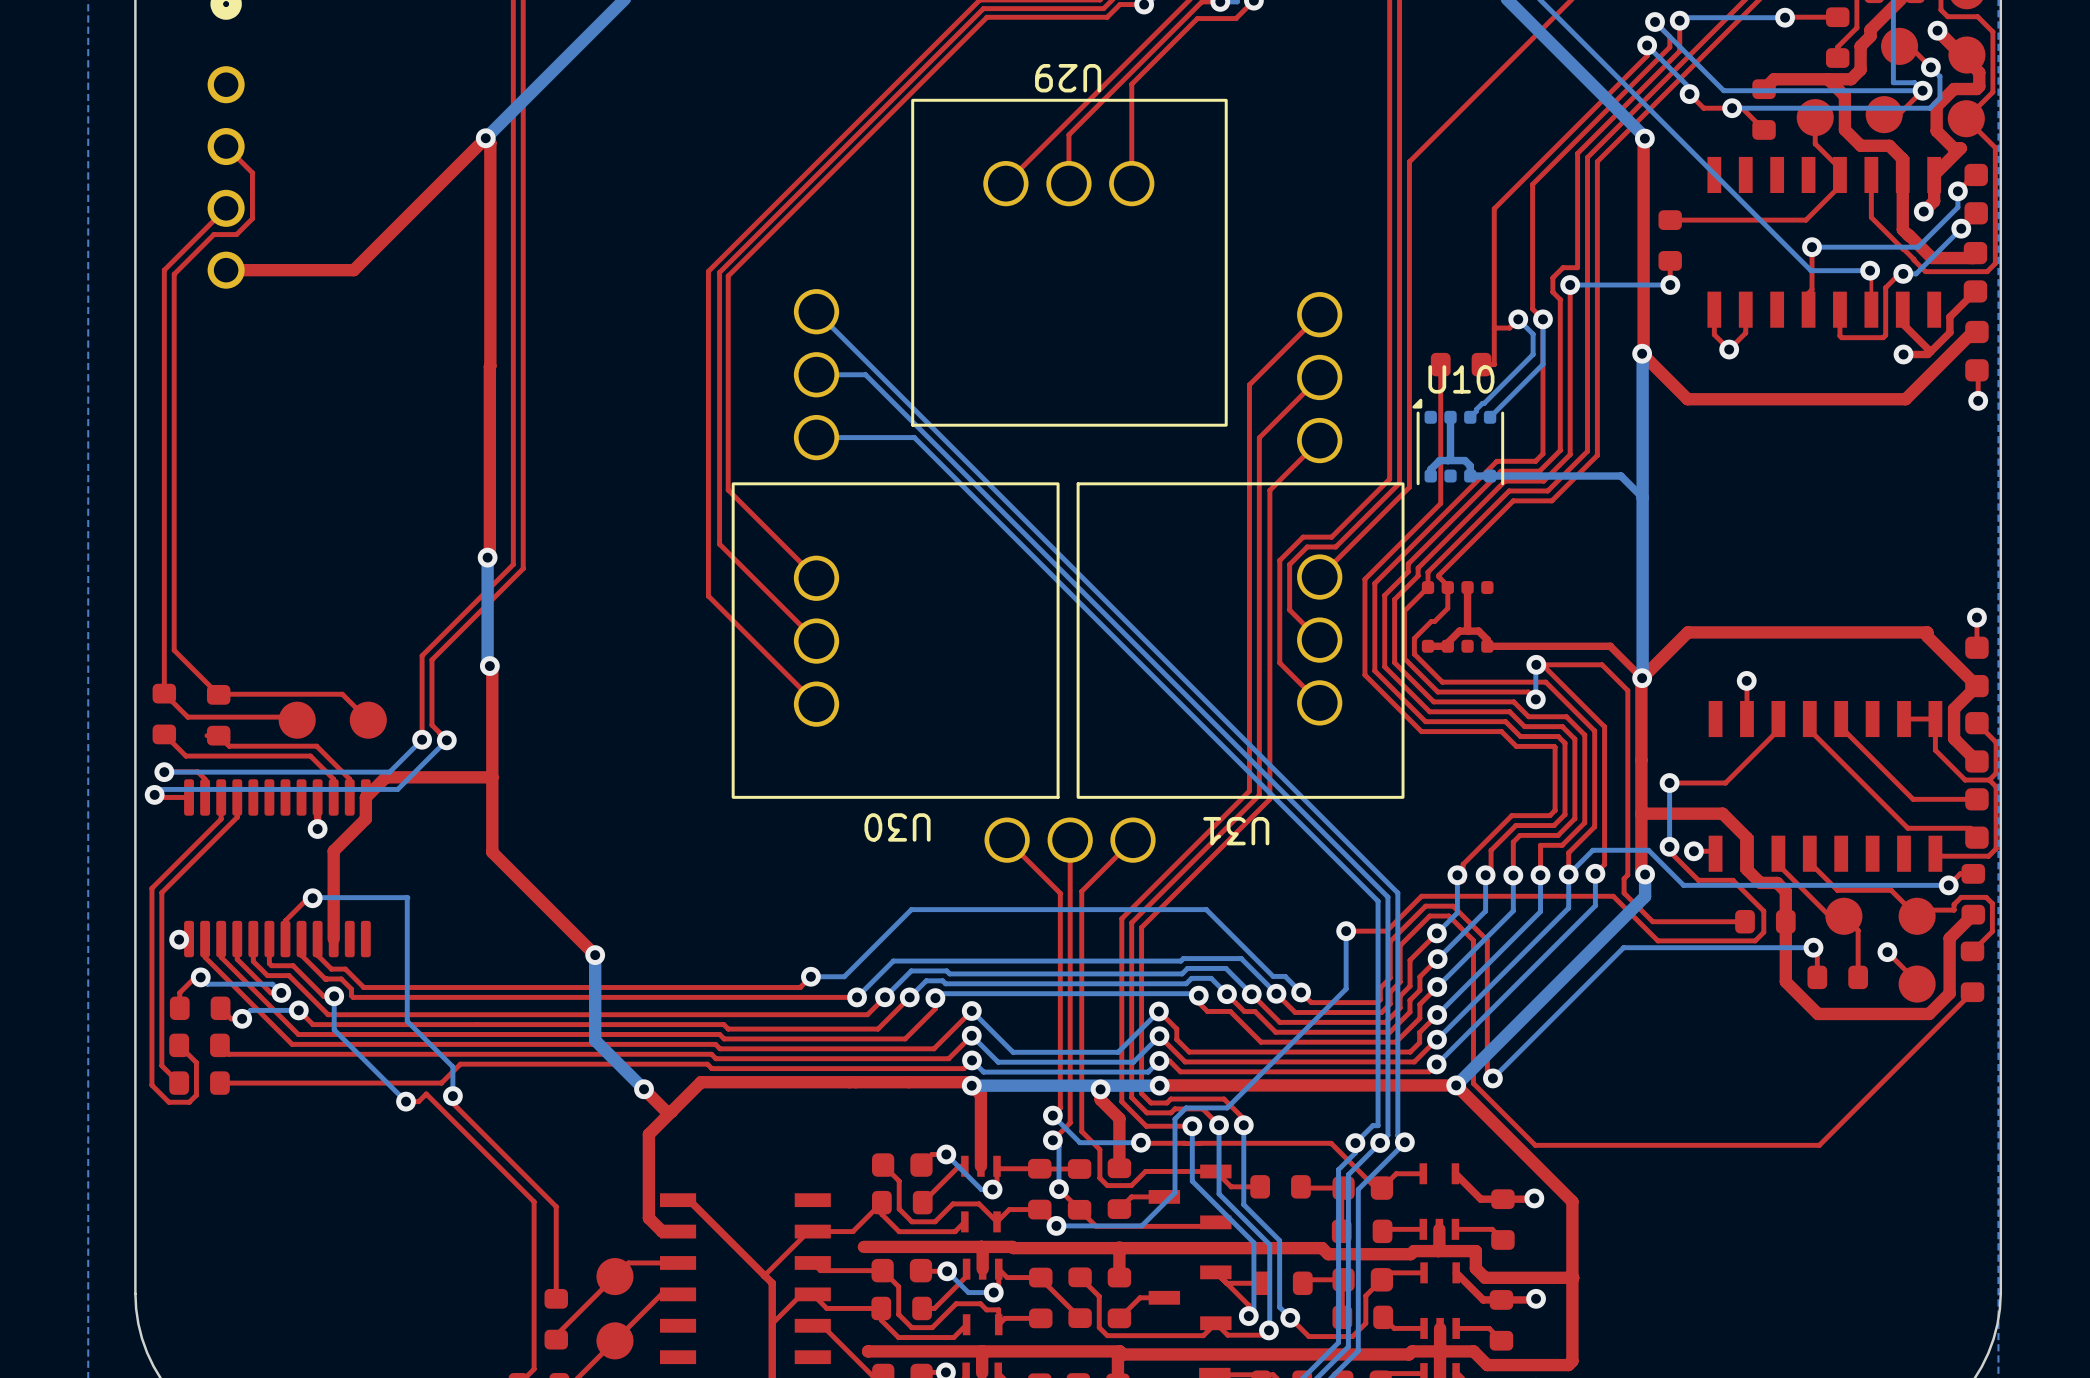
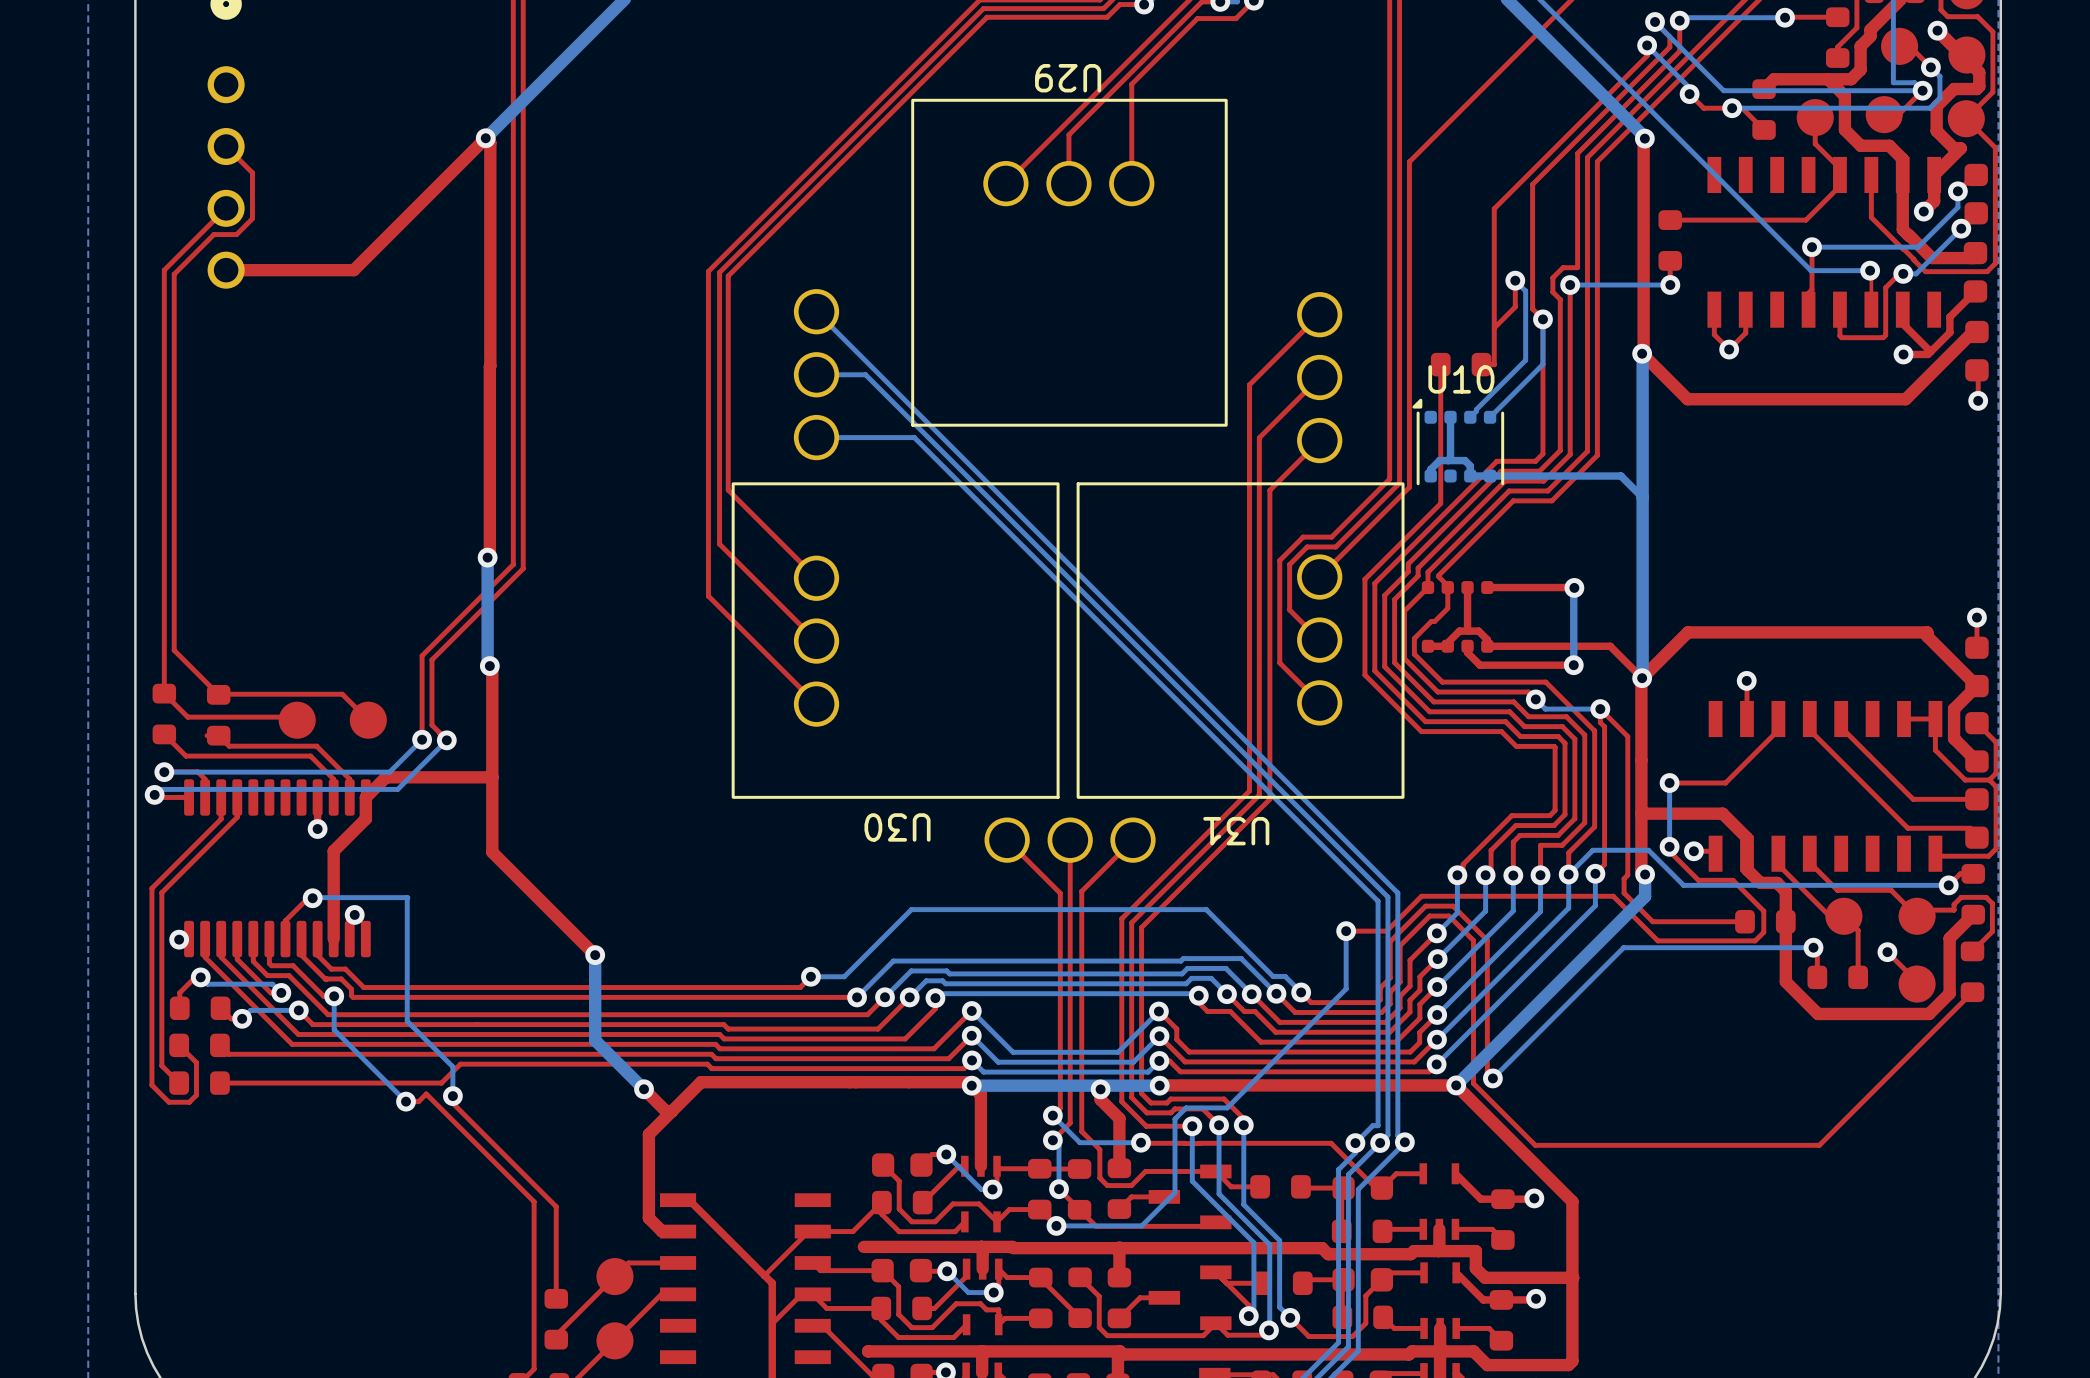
top track: (1518, 319) (1509, 328) (1494, 328) -> (1515, 280) (1515, 307) (1494, 328)
bottom track: (1518, 319) (1533, 334) (1533, 354) (1482, 403) -> (1515, 280) (1525, 291) (1525, 360) (1482, 403)
via position: (1518, 319) -> (1515, 280)
top track: none -> (1487, 587) (1574, 587)
bottom track: none -> (1574, 587) (1573, 665)
via: none -> (1574, 587)
top track: none -> (1467, 646) (1467, 652) (1479, 665) (1573, 665)
top track: (1536, 664) (1602, 664) (1627, 690) (1627, 736) -> (1600, 722) (1600, 709) (1627, 736)
bottom track: (1536, 664) (1535, 699) -> (1600, 709) (1545, 709) (1535, 699)
via position: (1536, 664) -> (1573, 665)
top track: (1542, 664) (1600, 722) -> none
via: none -> (1600, 709)
via: none -> (354, 914)

